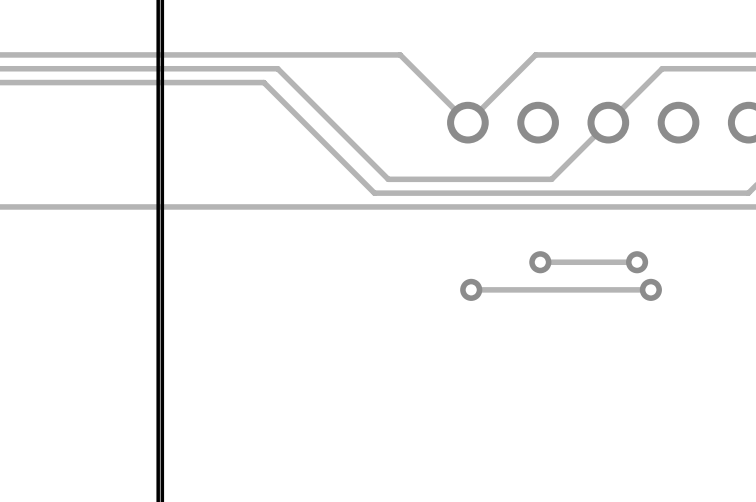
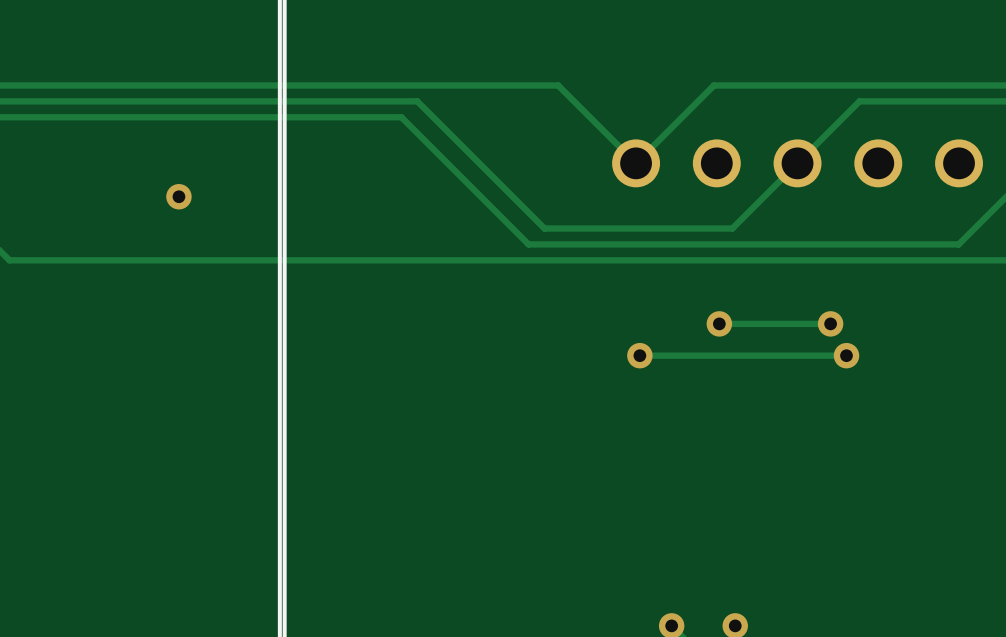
via: none -> (178, 196)

